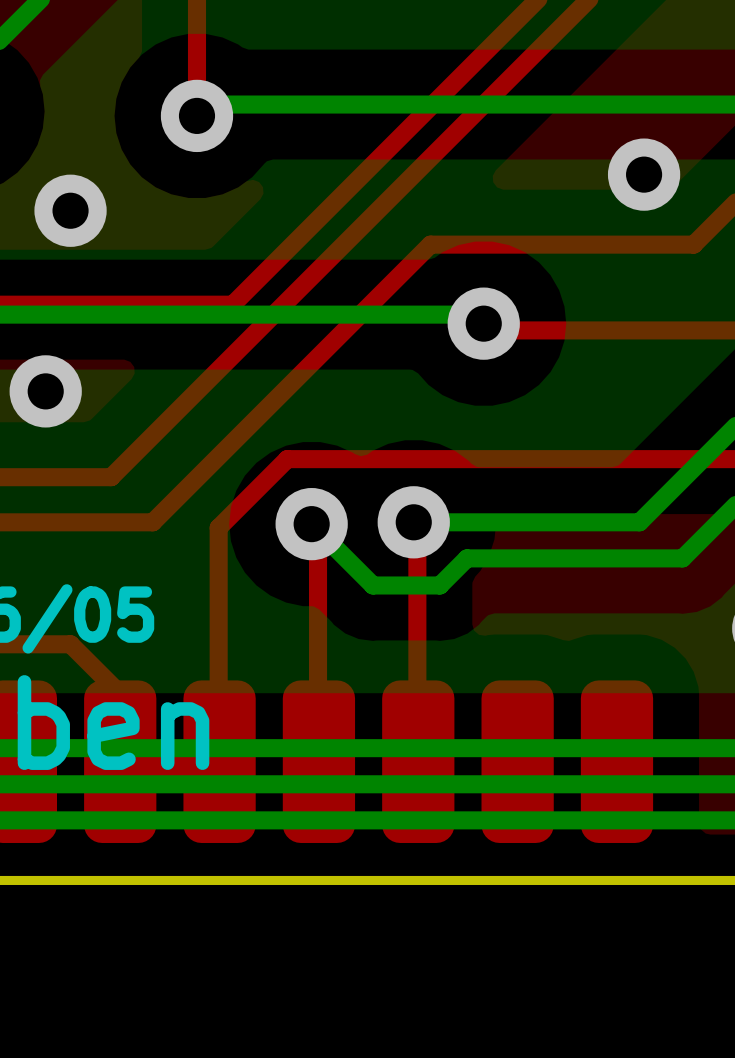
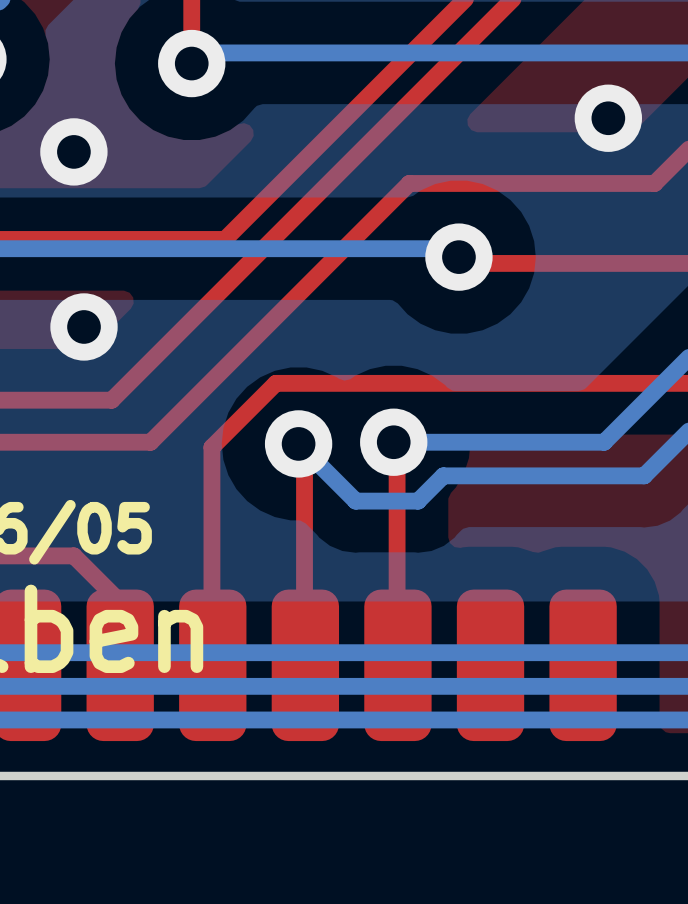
via position: (45, 391) -> (84, 326)

